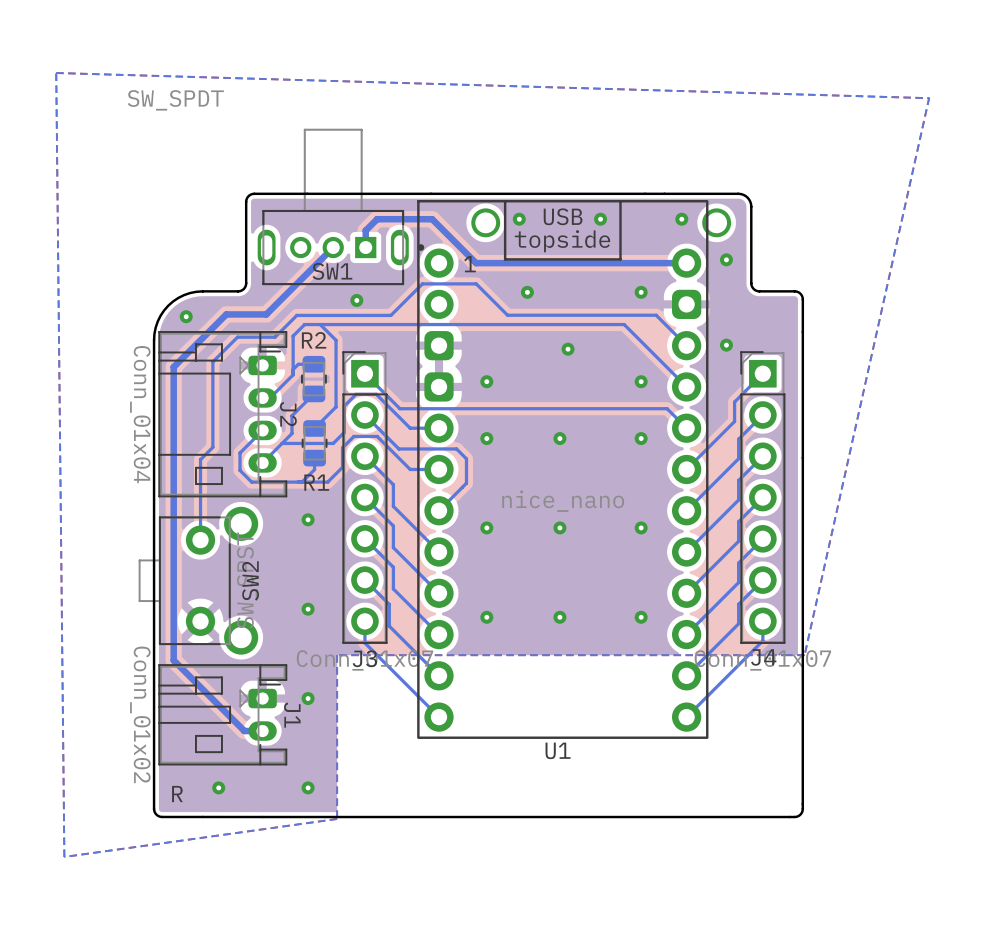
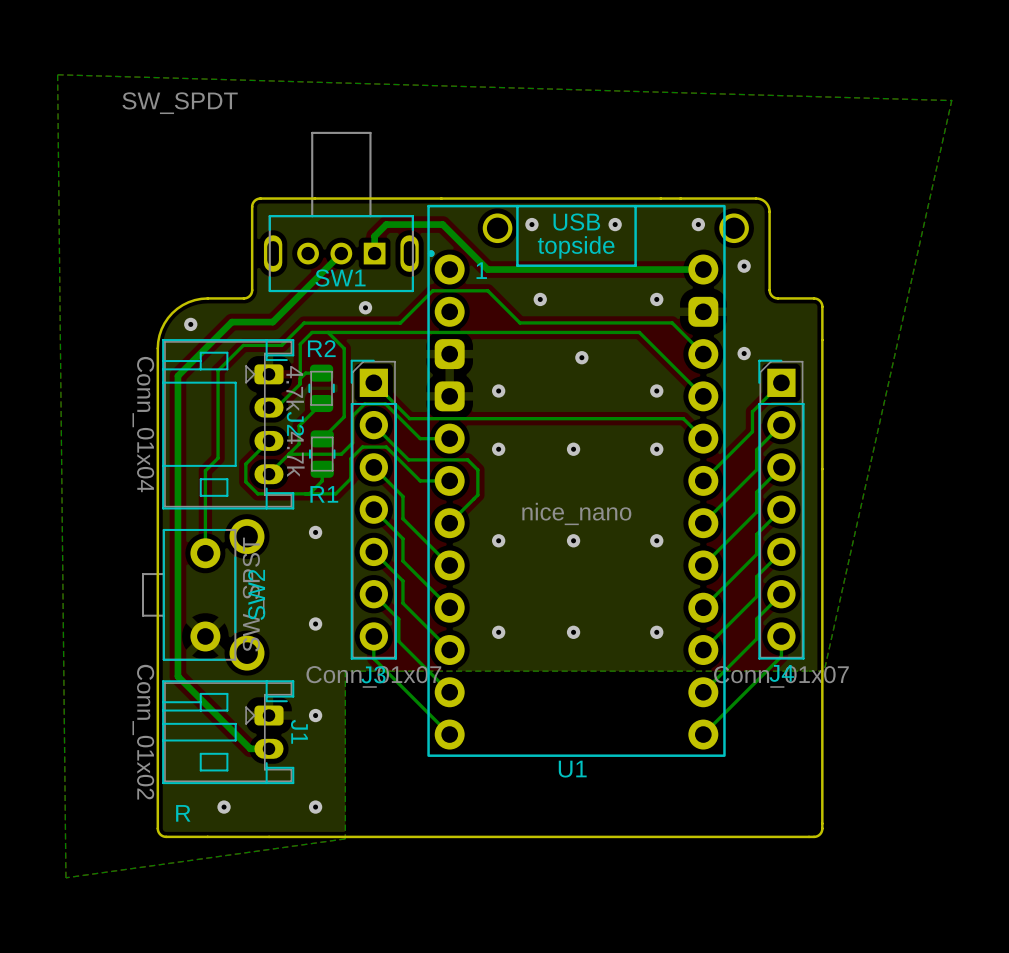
R2 value: none -> 4.7k (295, 388)
R1 value: none -> 4.7k (295, 454)

